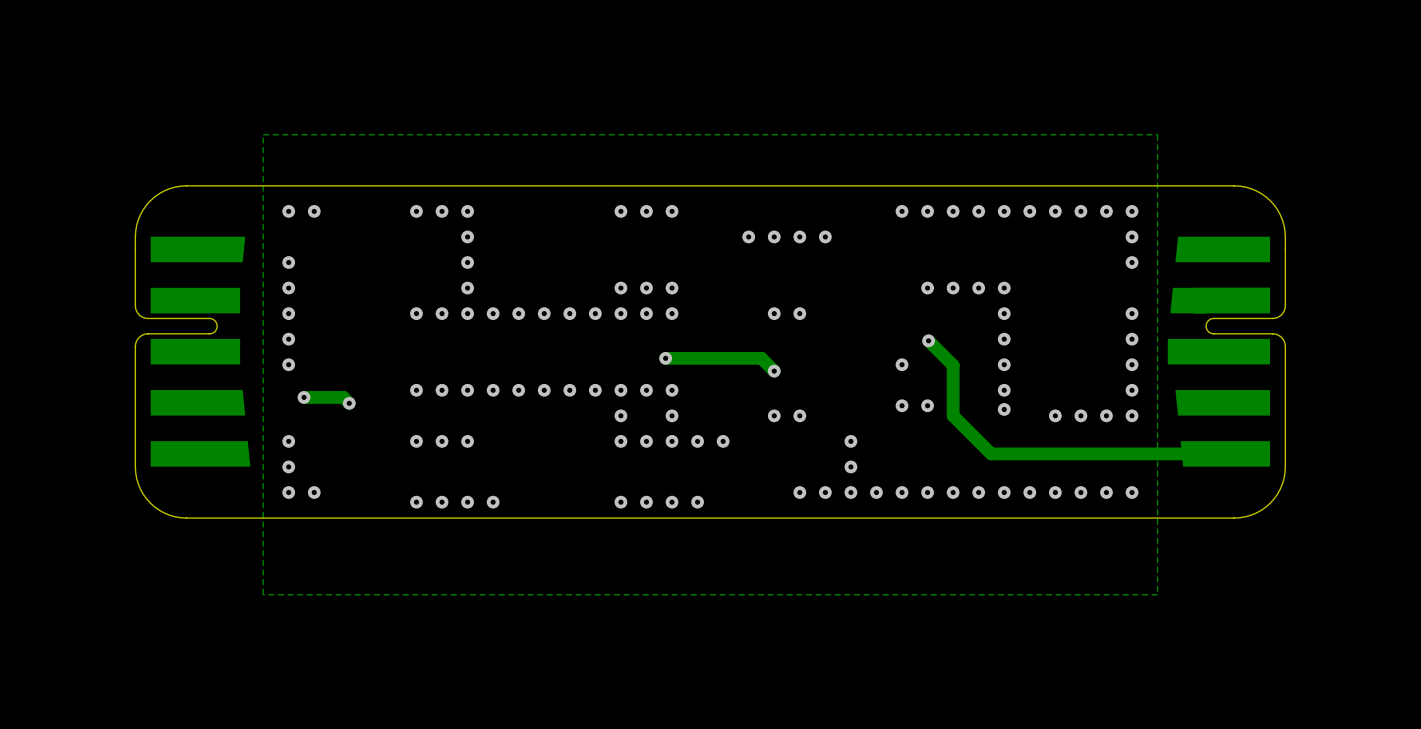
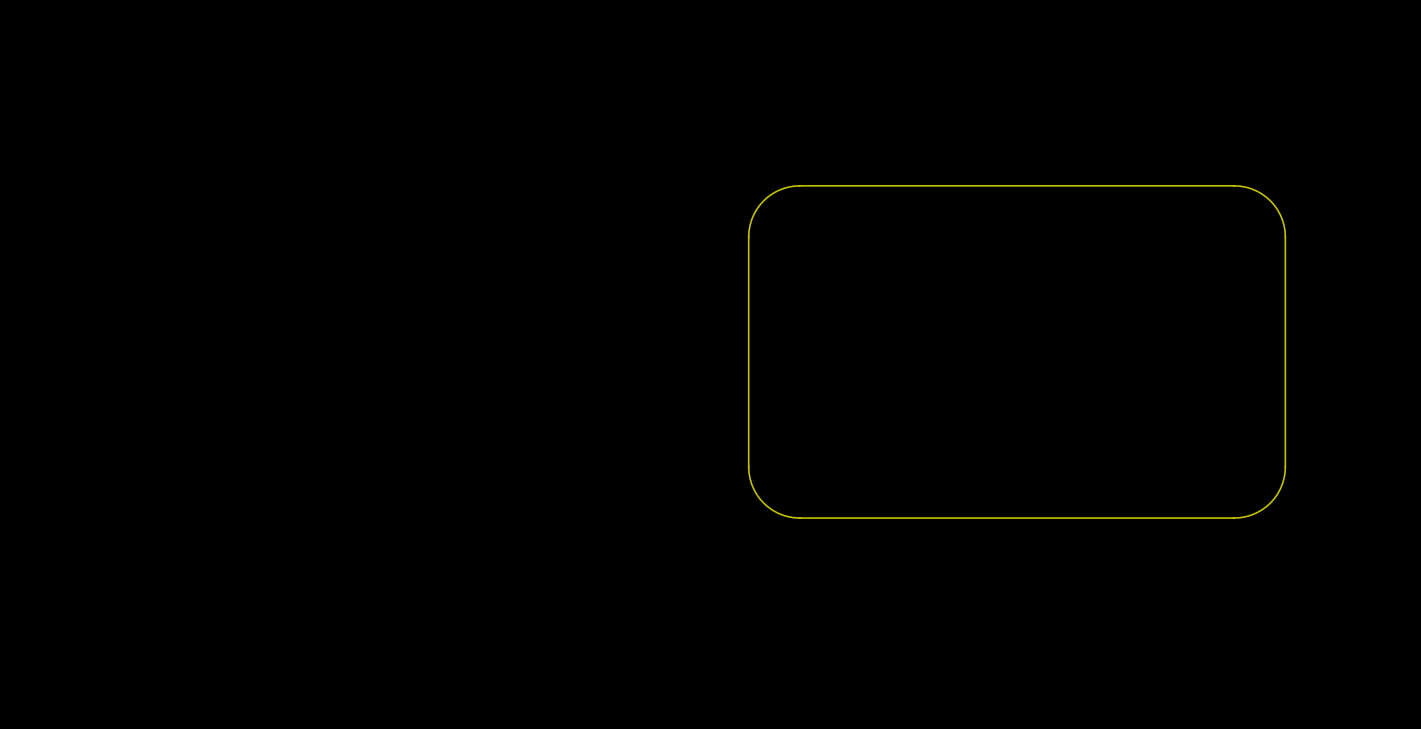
zone outline: (1157, 134) (263, 134) (263, 594) (1157, 594) (1157, 134) -> none
board edge: (799, 185) (180, 186) (159, 193) (146, 205) (136, 225) (135, 249) -> (799, 185) (782, 188) (763, 200) (753, 214) (748, 236) (749, 478) (756, 494) (767, 506) (782, 515) (799, 518)
via: (288, 211) -> none
via: (314, 211) -> none
via: (416, 211) -> none
via: (442, 211) -> none
via: (467, 211) -> none
via: (620, 211) -> none
via: (646, 211) -> none
via: (672, 211) -> none
via: (902, 211) -> none
via: (927, 211) -> none
via: (953, 211) -> none
via: (978, 211) -> none
via: (1004, 211) -> none
via: (1029, 211) -> none
via: (1055, 211) -> none
via: (1080, 211) -> none
via: (1106, 211) -> none
via: (1132, 211) -> none
via: (467, 236) -> none
via: (748, 236) -> none
via: (774, 236) -> none
via: (799, 236) -> none
via: (825, 236) -> none
via: (1132, 236) -> none
board edge: none -> (1285, 249) (1285, 454)
via: (288, 262) -> none
via: (467, 262) -> none
via: (1132, 262) -> none
via: (288, 288) -> none
via: (467, 288) -> none
via: (620, 288) -> none
via: (646, 288) -> none
via: (672, 288) -> none
via: (927, 288) -> none
via: (953, 288) -> none
via: (978, 288) -> none
via: (1004, 288) -> none
via: (288, 313) -> none
via: (416, 313) -> none
via: (442, 313) -> none
via: (467, 313) -> none
via: (493, 313) -> none
via: (518, 313) -> none
via: (544, 313) -> none
via: (569, 313) -> none
via: (595, 313) -> none
via: (620, 313) -> none
via: (646, 313) -> none
via: (672, 313) -> none
via: (774, 313) -> none
via: (799, 313) -> none
via: (1004, 313) -> none
via: (1132, 313) -> none
via: (288, 339) -> none
via: (1004, 339) -> none
via: (1132, 339) -> none
track: (928, 340) (953, 365) (953, 415) (991, 453) (1226, 453) -> none
via: (928, 340) -> none
part: (192, 351) -> none
part: (1226, 351) -> none
track: (665, 358) (761, 358) (774, 371) -> none
via: (665, 358) -> none
via: (288, 364) -> none
via: (902, 364) -> none
via: (1004, 364) -> none
via: (1132, 364) -> none
via: (774, 371) -> none
via: (416, 390) -> none
via: (442, 390) -> none
via: (467, 390) -> none
via: (493, 390) -> none
via: (518, 390) -> none
via: (544, 390) -> none
via: (569, 390) -> none
via: (595, 390) -> none
via: (620, 390) -> none
via: (646, 390) -> none
via: (672, 390) -> none
via: (1004, 390) -> none
via: (1132, 390) -> none
track: (304, 397) (343, 397) (349, 403) -> none
via: (304, 397) -> none
via: (349, 403) -> none
via: (902, 405) -> none
via: (927, 405) -> none
via: (1004, 409) -> none
via: (620, 415) -> none
via: (672, 415) -> none
via: (774, 415) -> none
via: (799, 415) -> none
via: (1055, 415) -> none
via: (1080, 415) -> none
via: (1106, 415) -> none
via: (1132, 415) -> none
via: (288, 441) -> none
via: (416, 441) -> none
via: (442, 441) -> none
via: (467, 441) -> none
via: (620, 441) -> none
via: (646, 441) -> none
via: (672, 441) -> none
via: (697, 441) -> none
via: (723, 441) -> none
via: (850, 441) -> none
board edge: (135, 454) (136, 478) (146, 498) (159, 510) (180, 517) (799, 518) -> none
via: (288, 466) -> none
via: (850, 466) -> none
via: (288, 492) -> none
via: (314, 492) -> none
via: (799, 492) -> none
via: (825, 492) -> none
via: (850, 492) -> none
via: (876, 492) -> none
via: (902, 492) -> none
via: (927, 492) -> none
via: (953, 492) -> none
via: (978, 492) -> none
via: (1004, 492) -> none
via: (1029, 492) -> none
via: (1055, 492) -> none
via: (1080, 492) -> none
via: (1106, 492) -> none
via: (1132, 492) -> none
via: (416, 502) -> none
via: (442, 502) -> none
via: (467, 502) -> none
via: (493, 502) -> none
via: (620, 502) -> none
via: (646, 502) -> none
via: (672, 502) -> none
via: (697, 502) -> none

